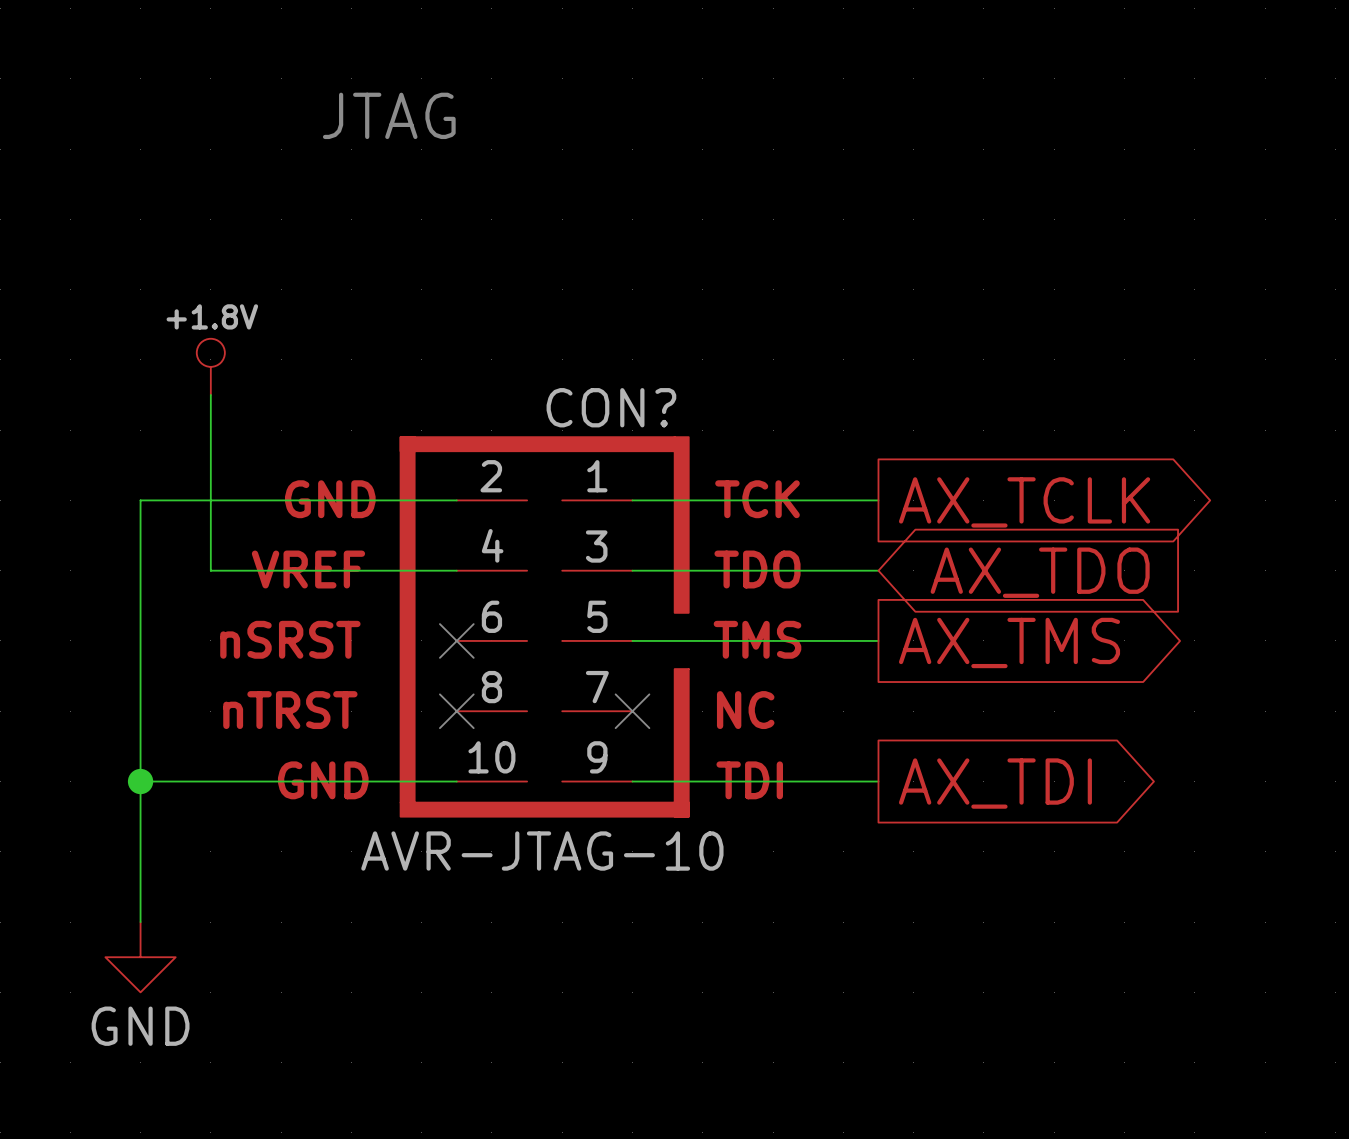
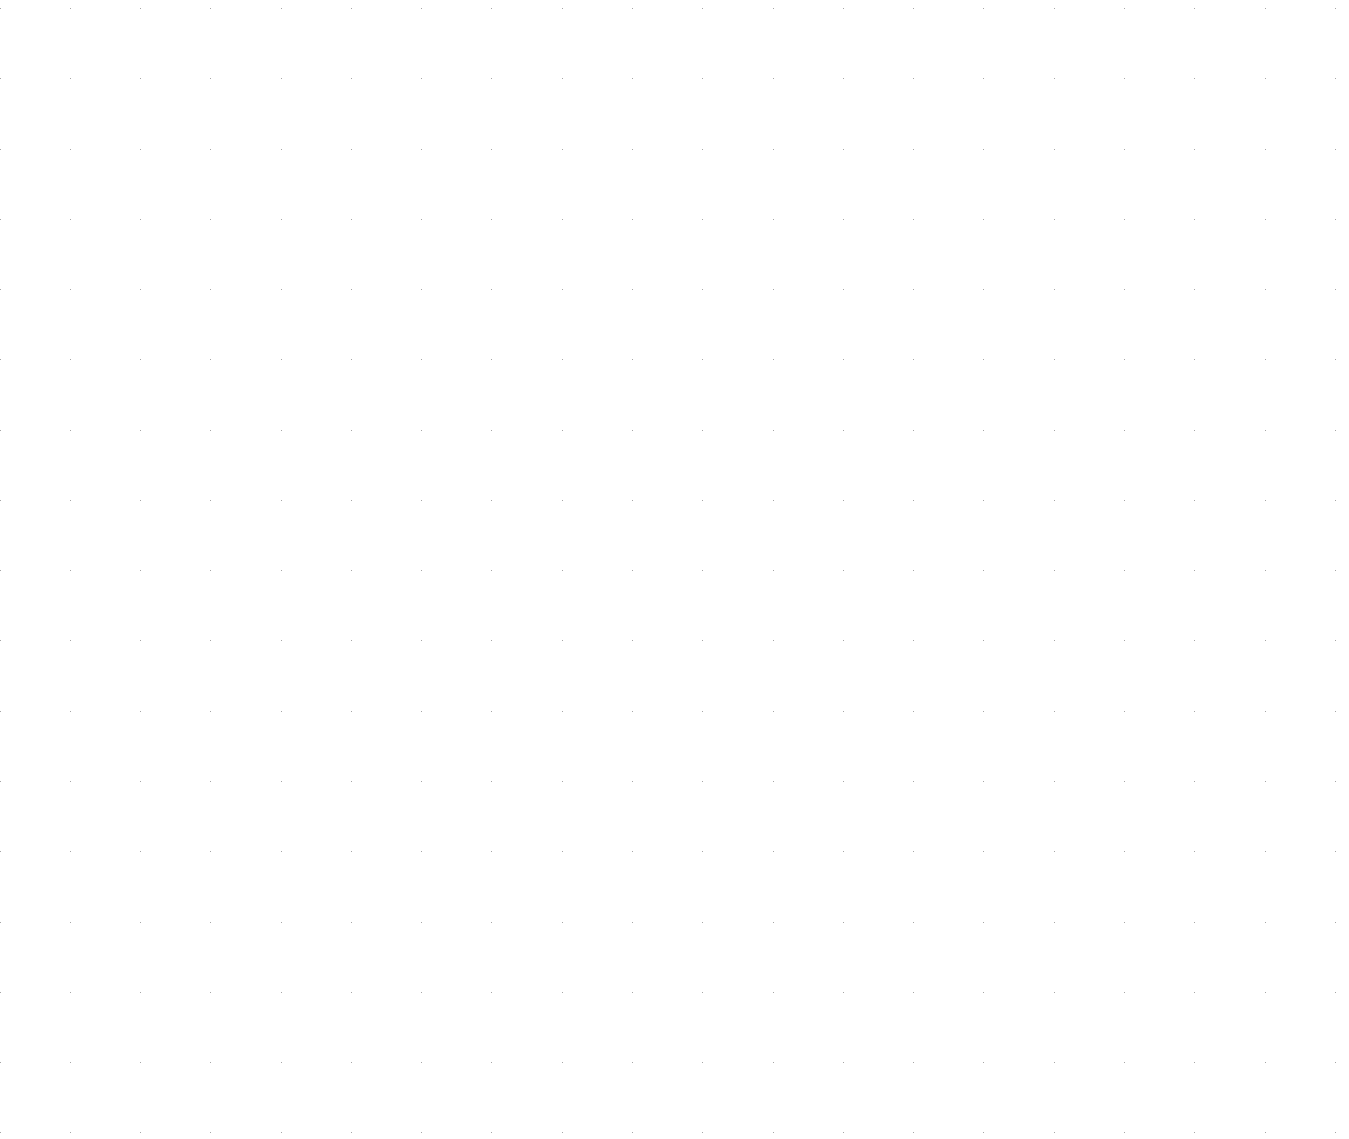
text: JTAG (389, 115) -> none
power symbol: +1.8V (210, 366) -> none
wire: (210, 394) (210, 570) (456, 570) -> none
wire: (456, 500) (140, 500) (140, 922) -> none
wire: (632, 500) (878, 500) -> none
global label: AX_TCLK (1024, 502) -> none
wire: (632, 570) (878, 570) -> none
global label: AX_TDO (1040, 572) -> none
CON?: AVR-JTAG-10 (544, 626) -> none
no-connect mark: (456, 640) -> none
wire: (632, 640) (878, 640) -> none
global label: AX_TMS (1009, 642) -> none
no-connect mark: (456, 711) -> none
no-connect mark: (632, 711) -> none
wire: (140, 781) (456, 781) -> none
junction: (140, 781) -> none
wire: (632, 781) (878, 781) -> none
global label: AX_TDI (995, 783) -> none
power symbol: GND (140, 957) -> none

